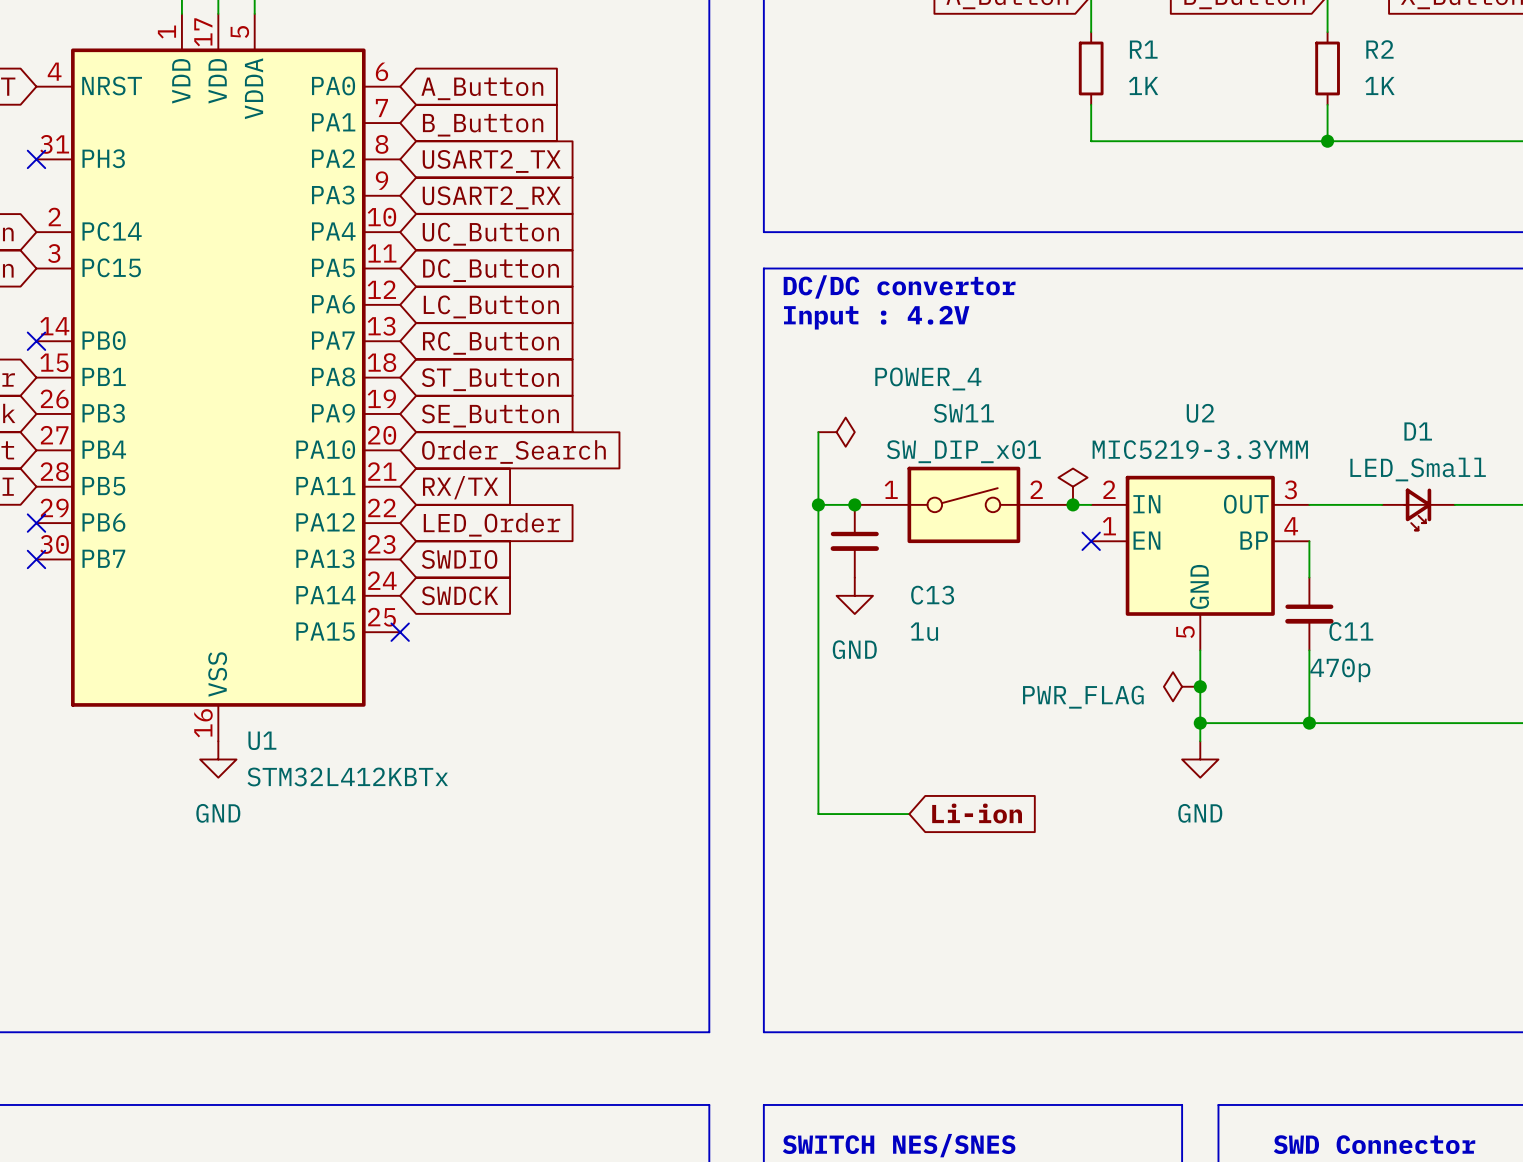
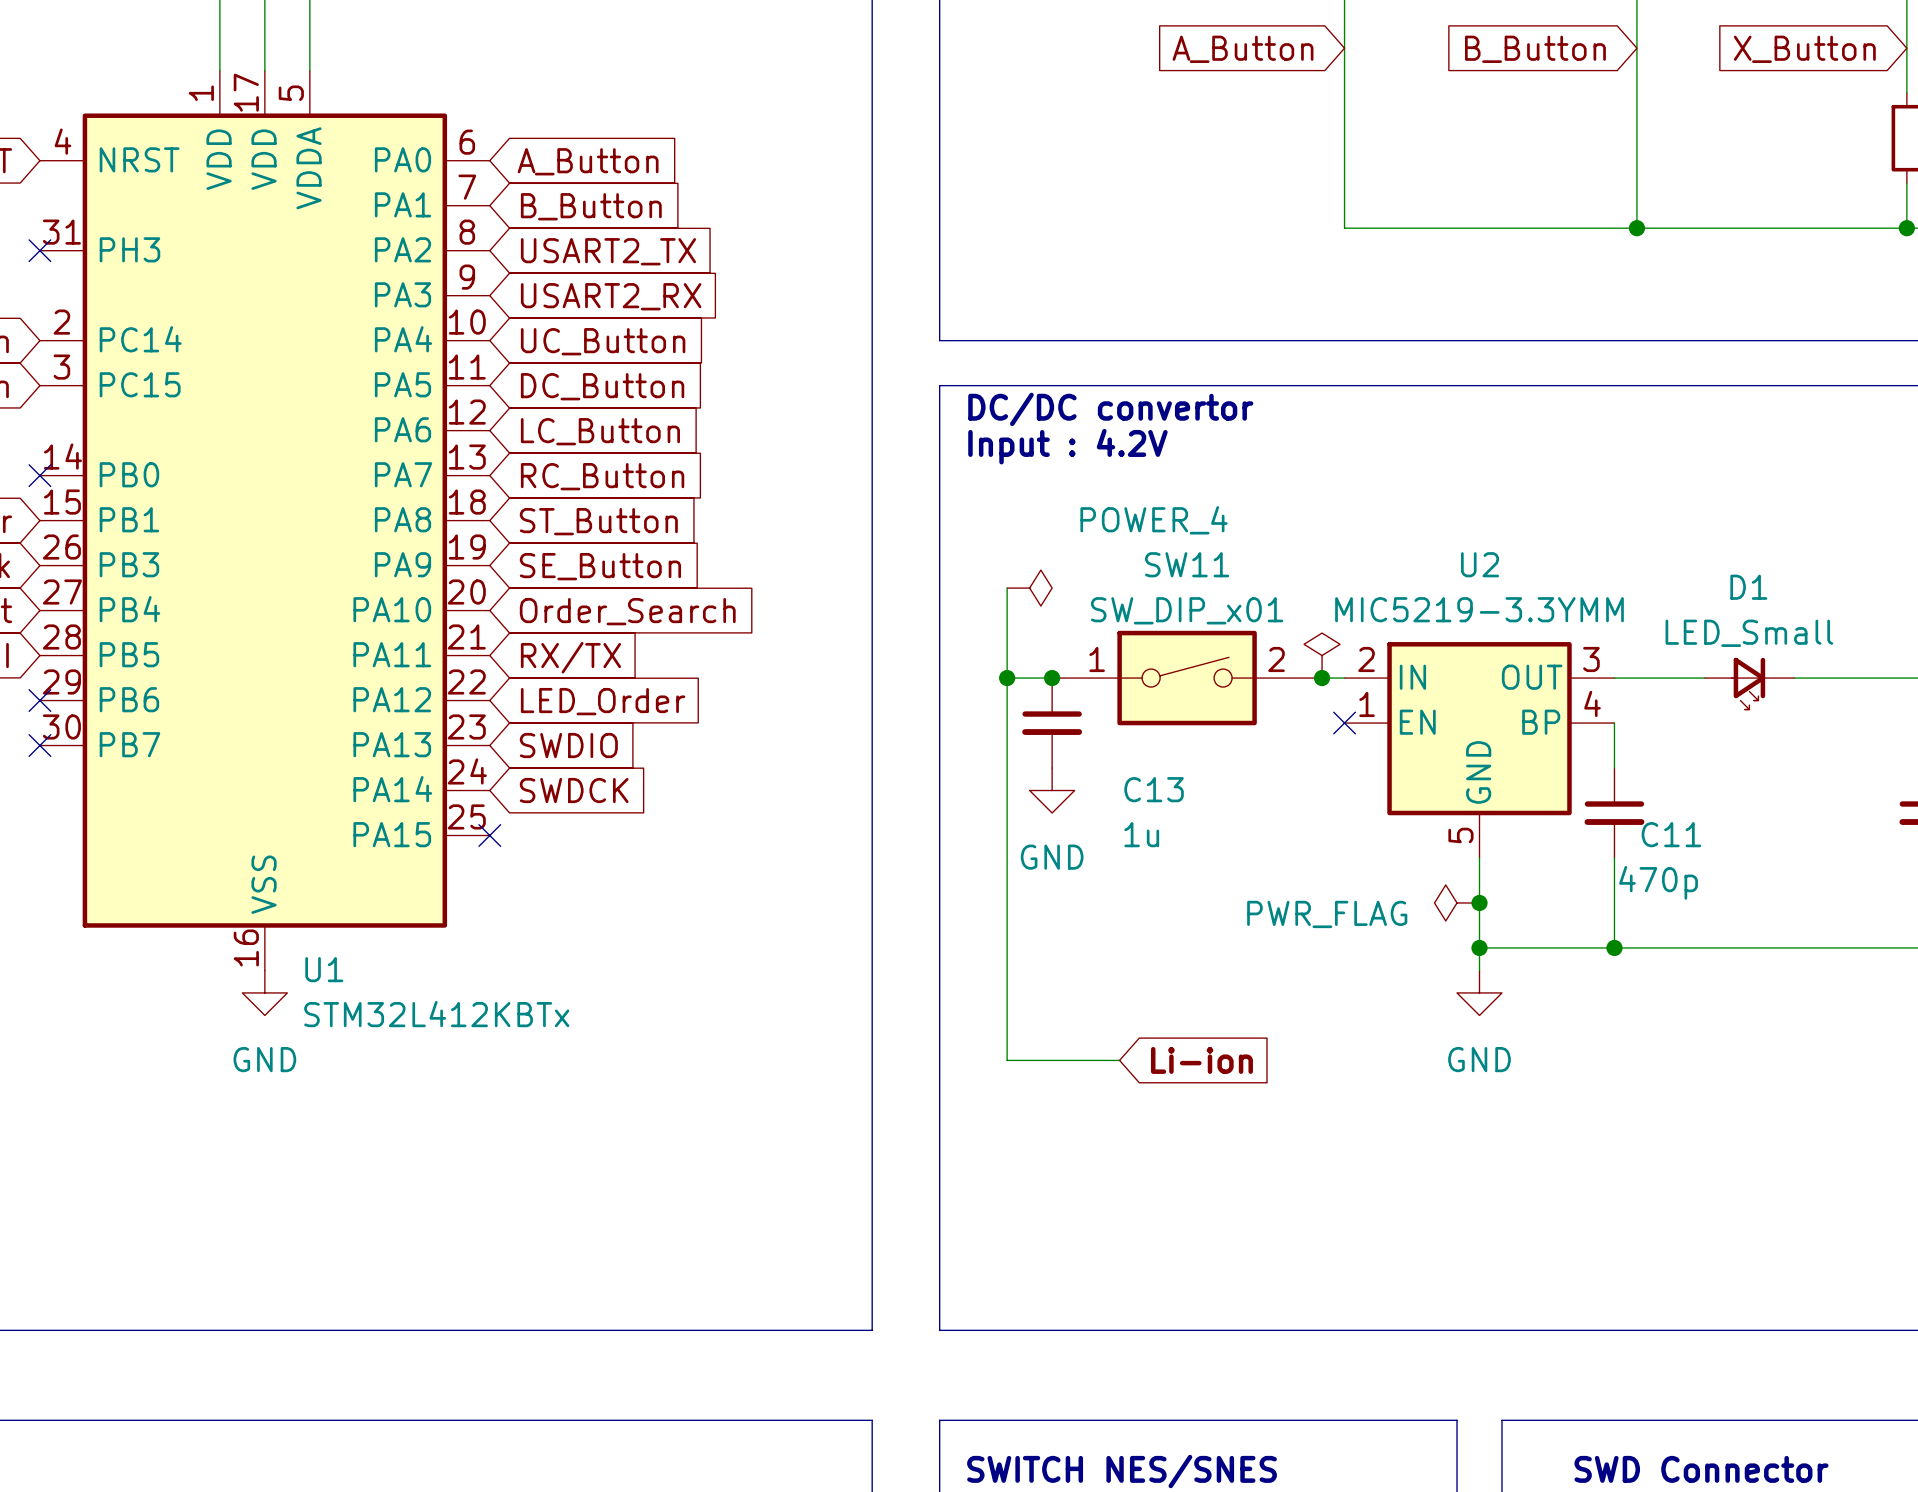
wire: none -> (1344, 93) (1344, 183)
wire: none -> (1636, 93) (1636, 183)
R1: 1K (1091, 68) -> none
R2: 1K (1327, 68) -> none

